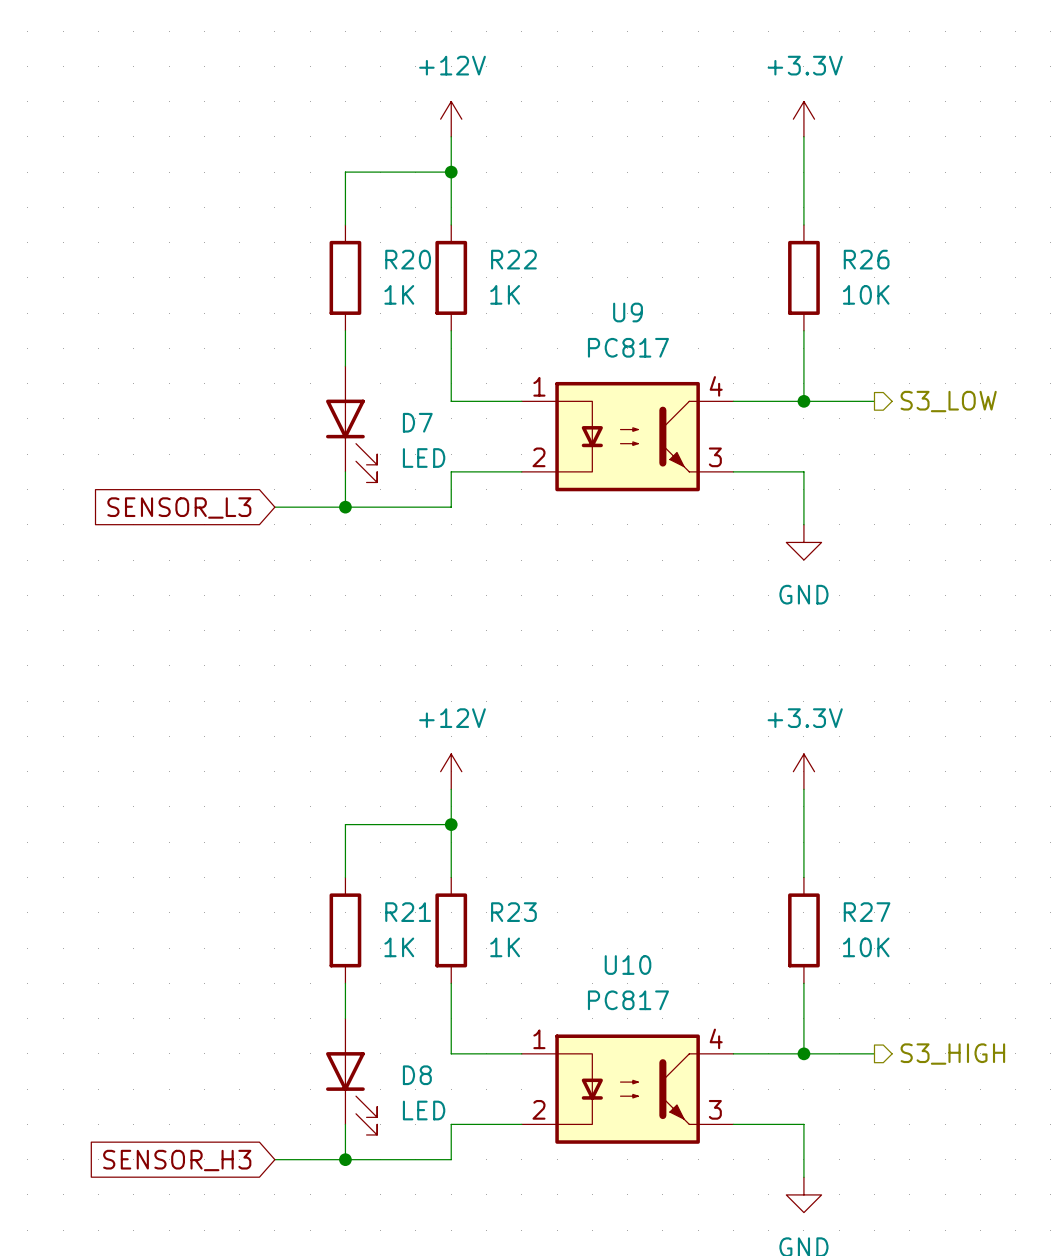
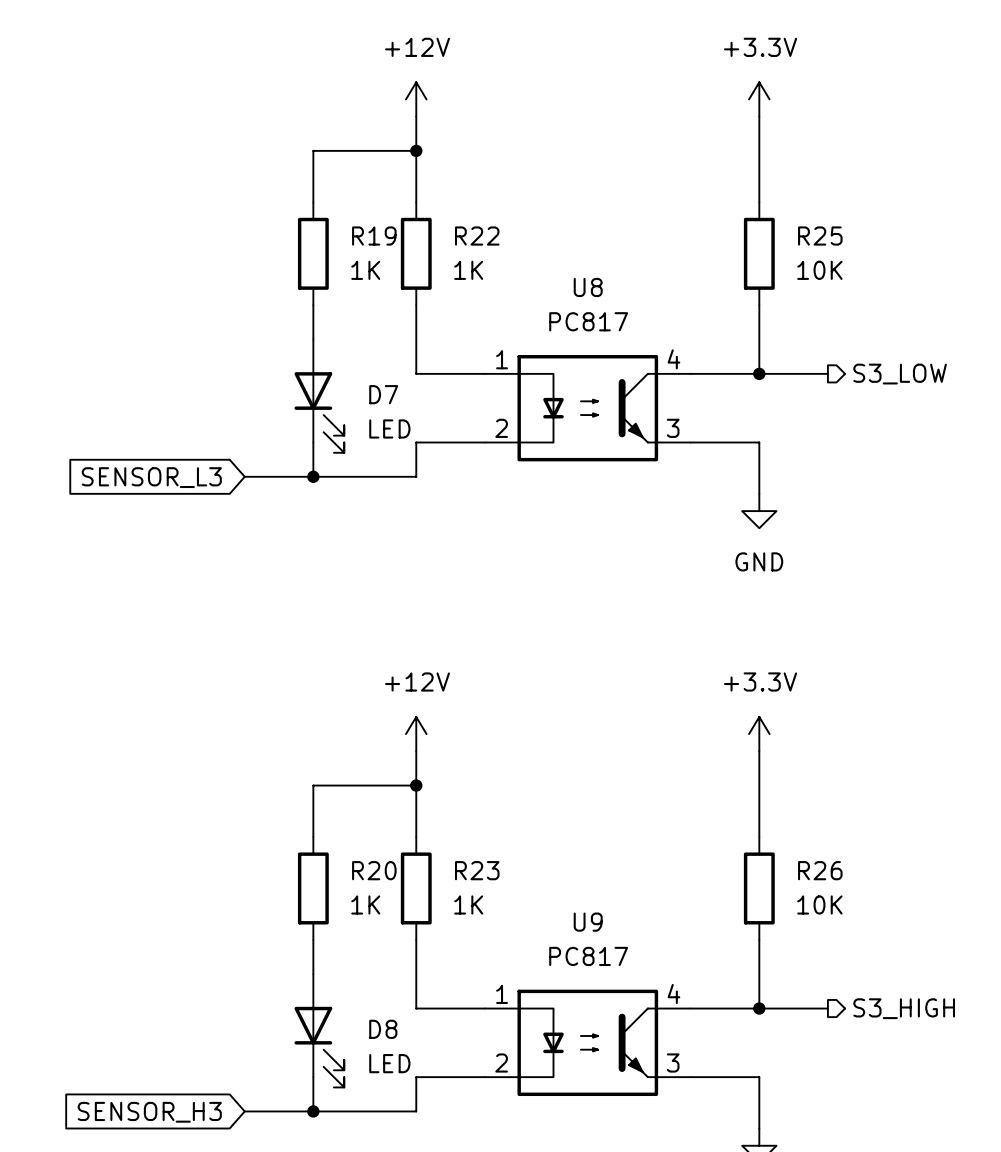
R20 name: R20 (408, 259) -> R19 (374, 236)
R26 name: R26 (866, 259) -> R25 (820, 236)
U9 name: U9 (628, 312) -> U8 (588, 287)
R21 name: R21 (408, 912) -> R20 (374, 870)
R27 name: R27 (867, 912) -> R26 (820, 870)
U10 name: U10 (628, 965) -> U9 (588, 922)

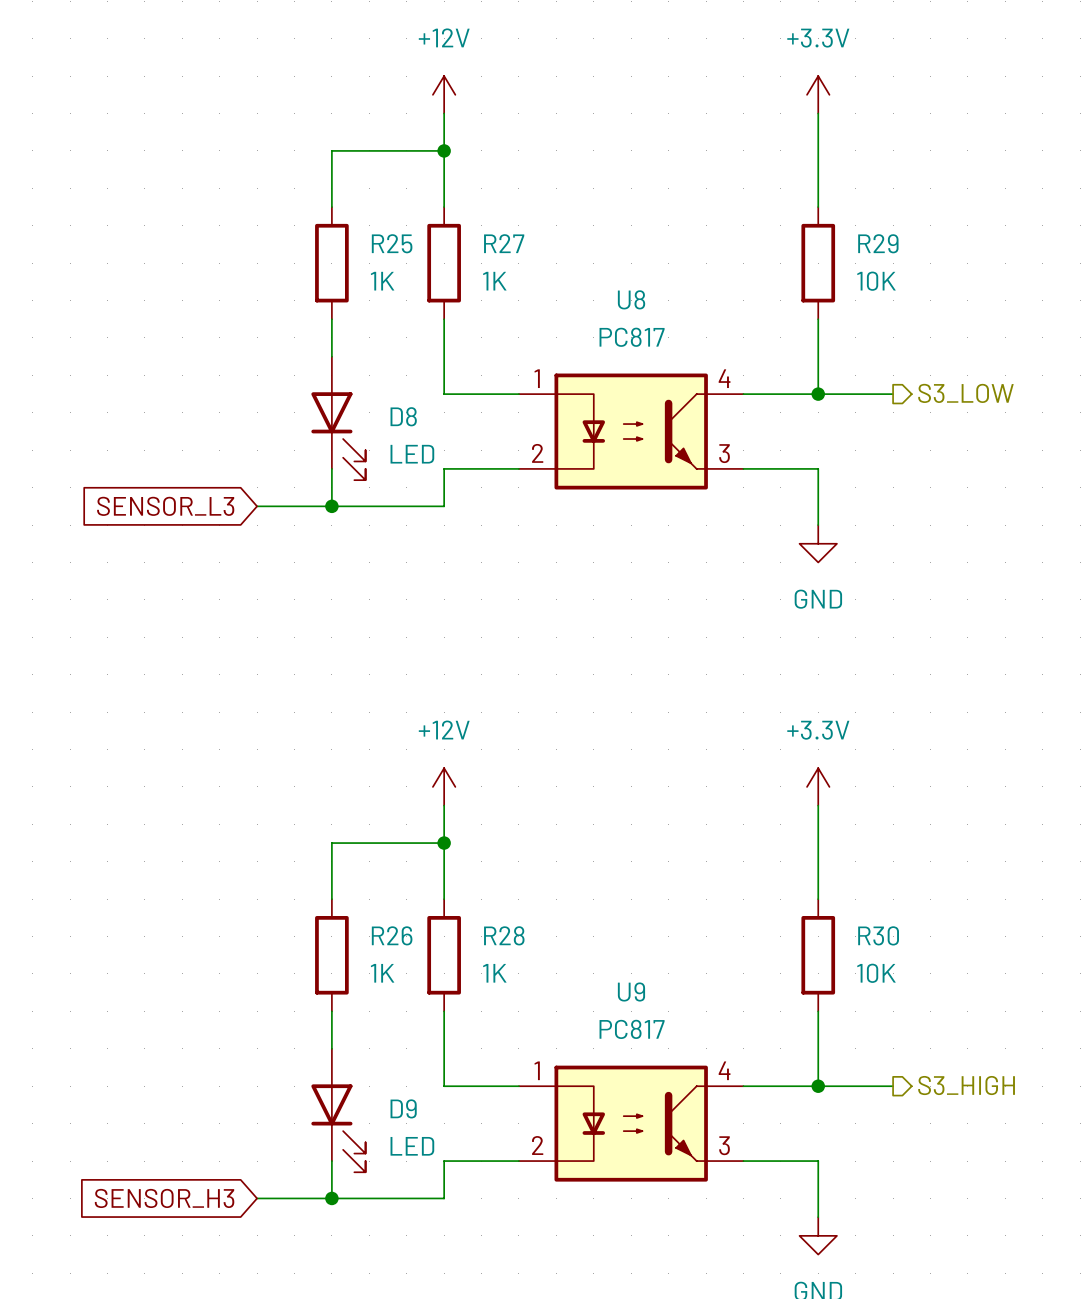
R19 name: R19 (374, 236) -> R25 (392, 243)
R22 name: R22 (477, 236) -> R27 (504, 243)
R25 name: R25 (820, 236) -> R29 (878, 243)
D7 name: D7 (383, 394) -> D8 (403, 416)
R20 name: R20 (374, 870) -> R26 (392, 935)
R23 name: R23 (477, 870) -> R28 (504, 935)
R26 name: R26 (820, 870) -> R30 (878, 935)
D8 name: D8 (383, 1029) -> D9 (403, 1108)

